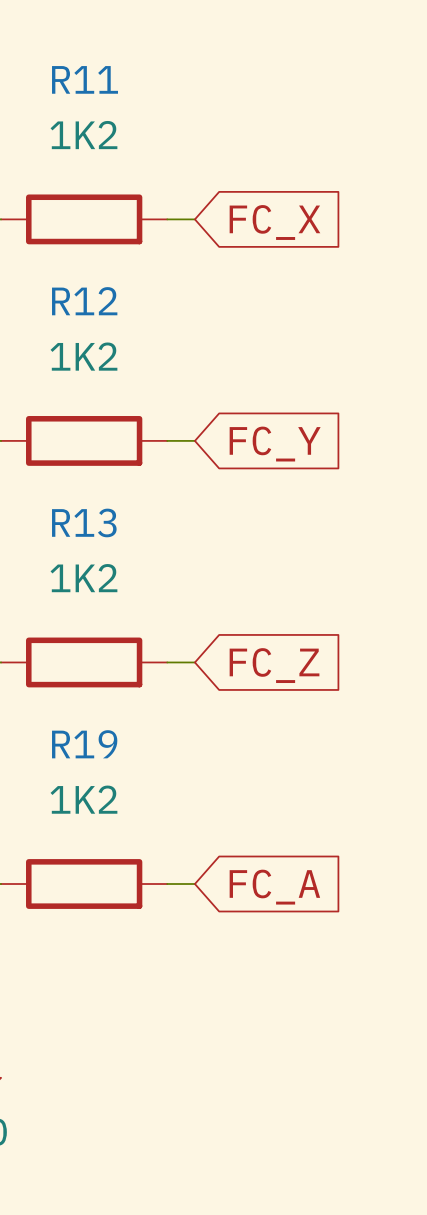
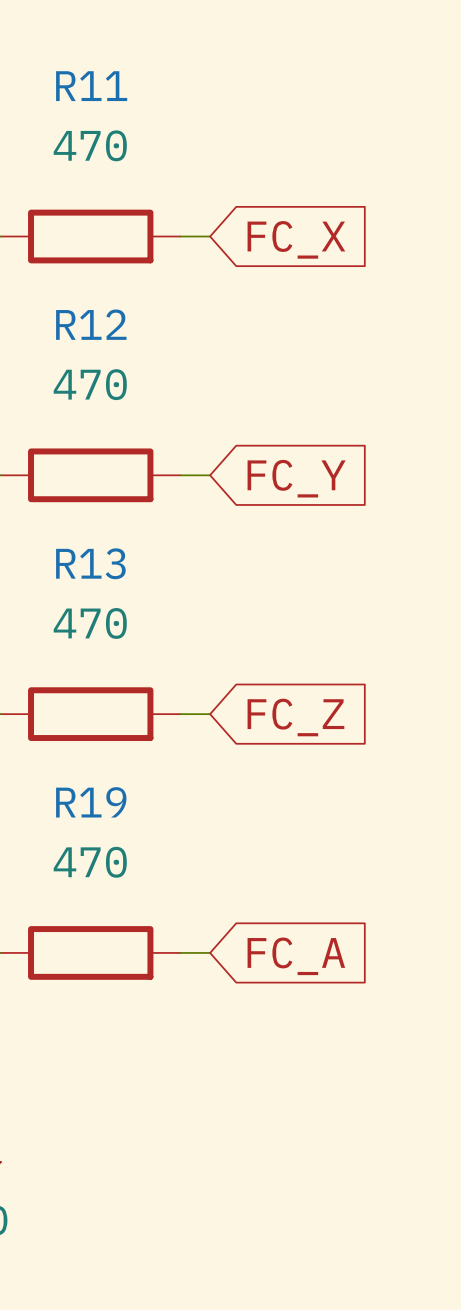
R11 value: 1K2 (83, 135) -> 470 (90, 145)
R12 value: 1K2 (83, 356) -> 470 (90, 384)
R13 value: 1K2 (83, 578) -> 470 (90, 623)
R19 value: 1K2 (83, 799) -> 470 (90, 862)

